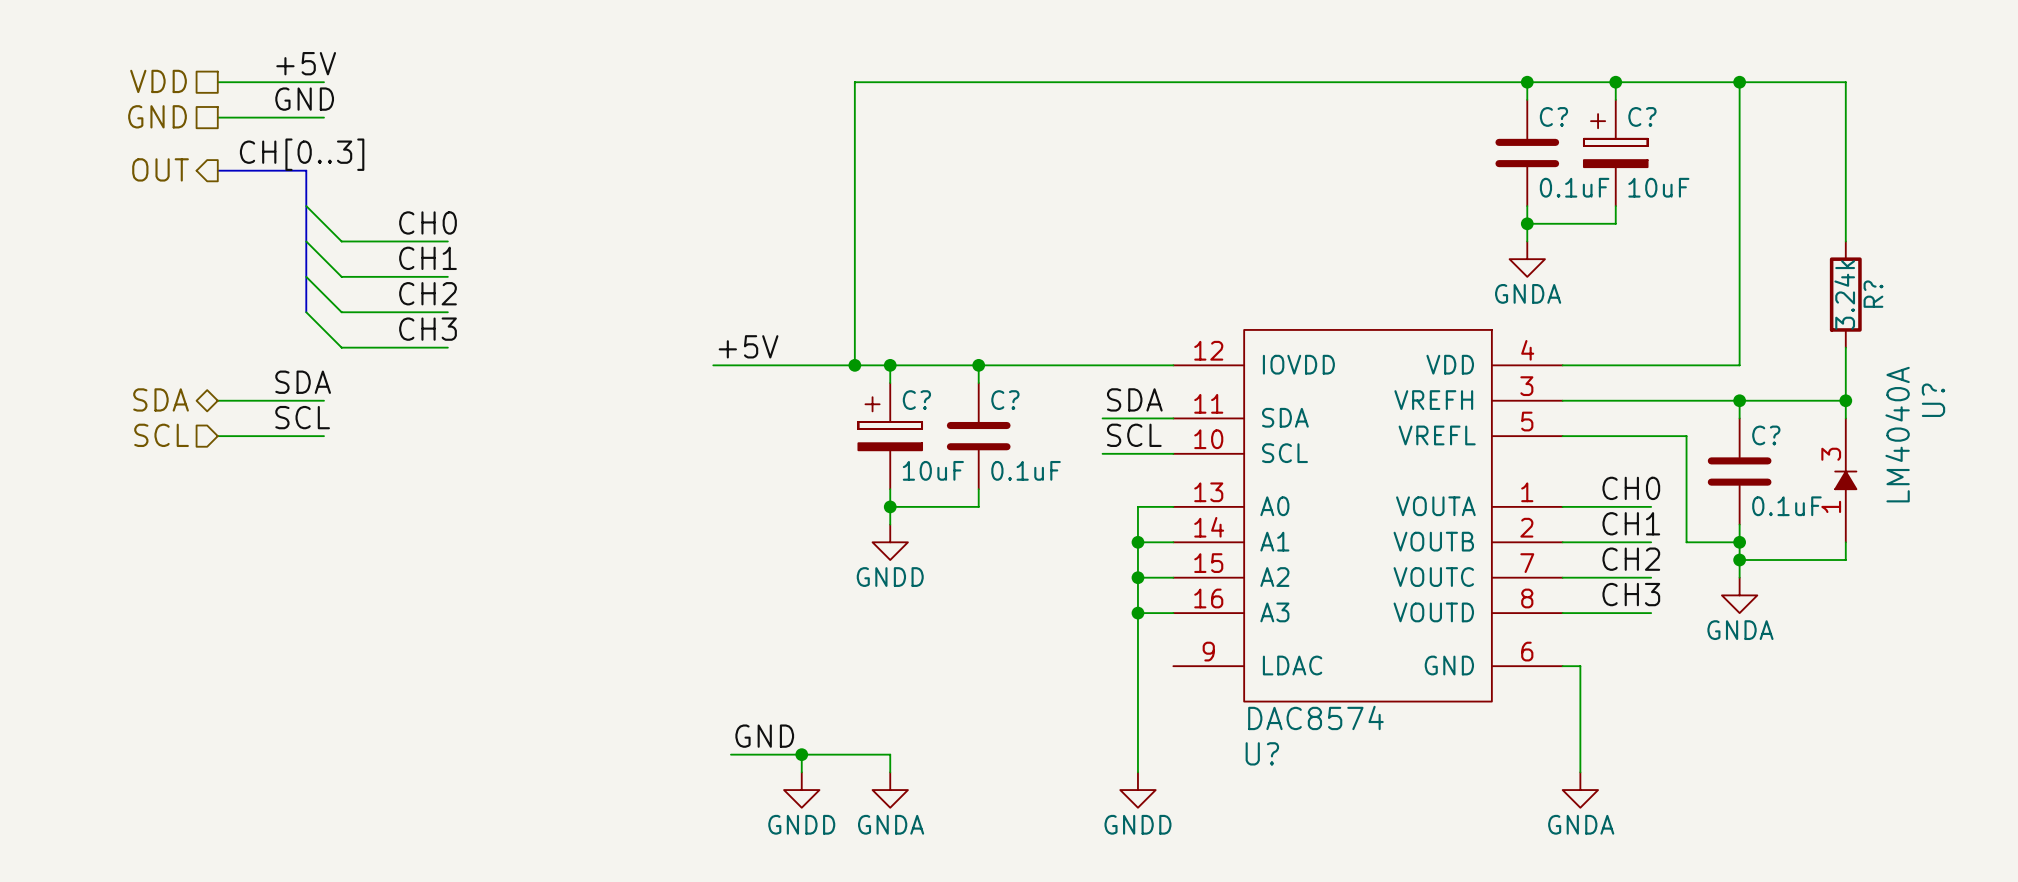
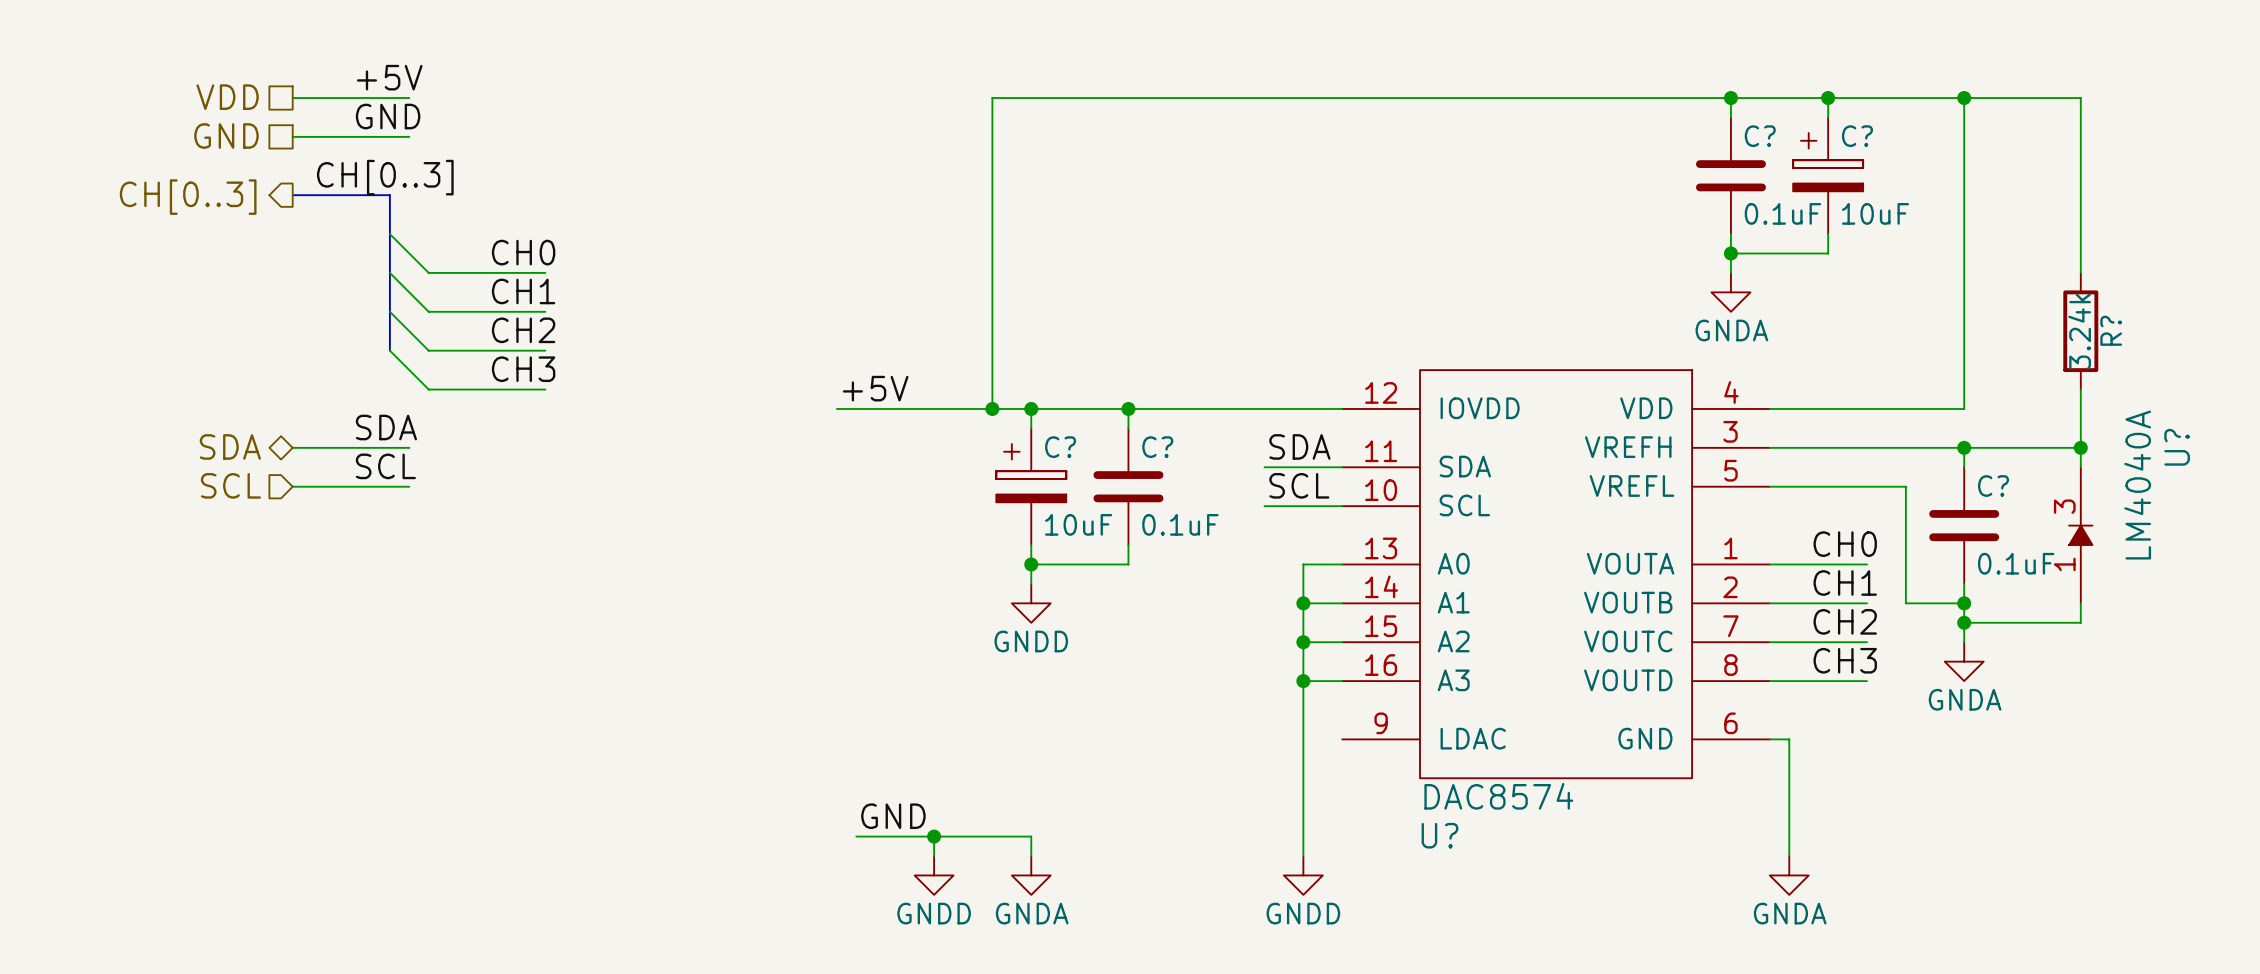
hierarchical label: OUT (160, 169) -> CH[0..3] (188, 197)

